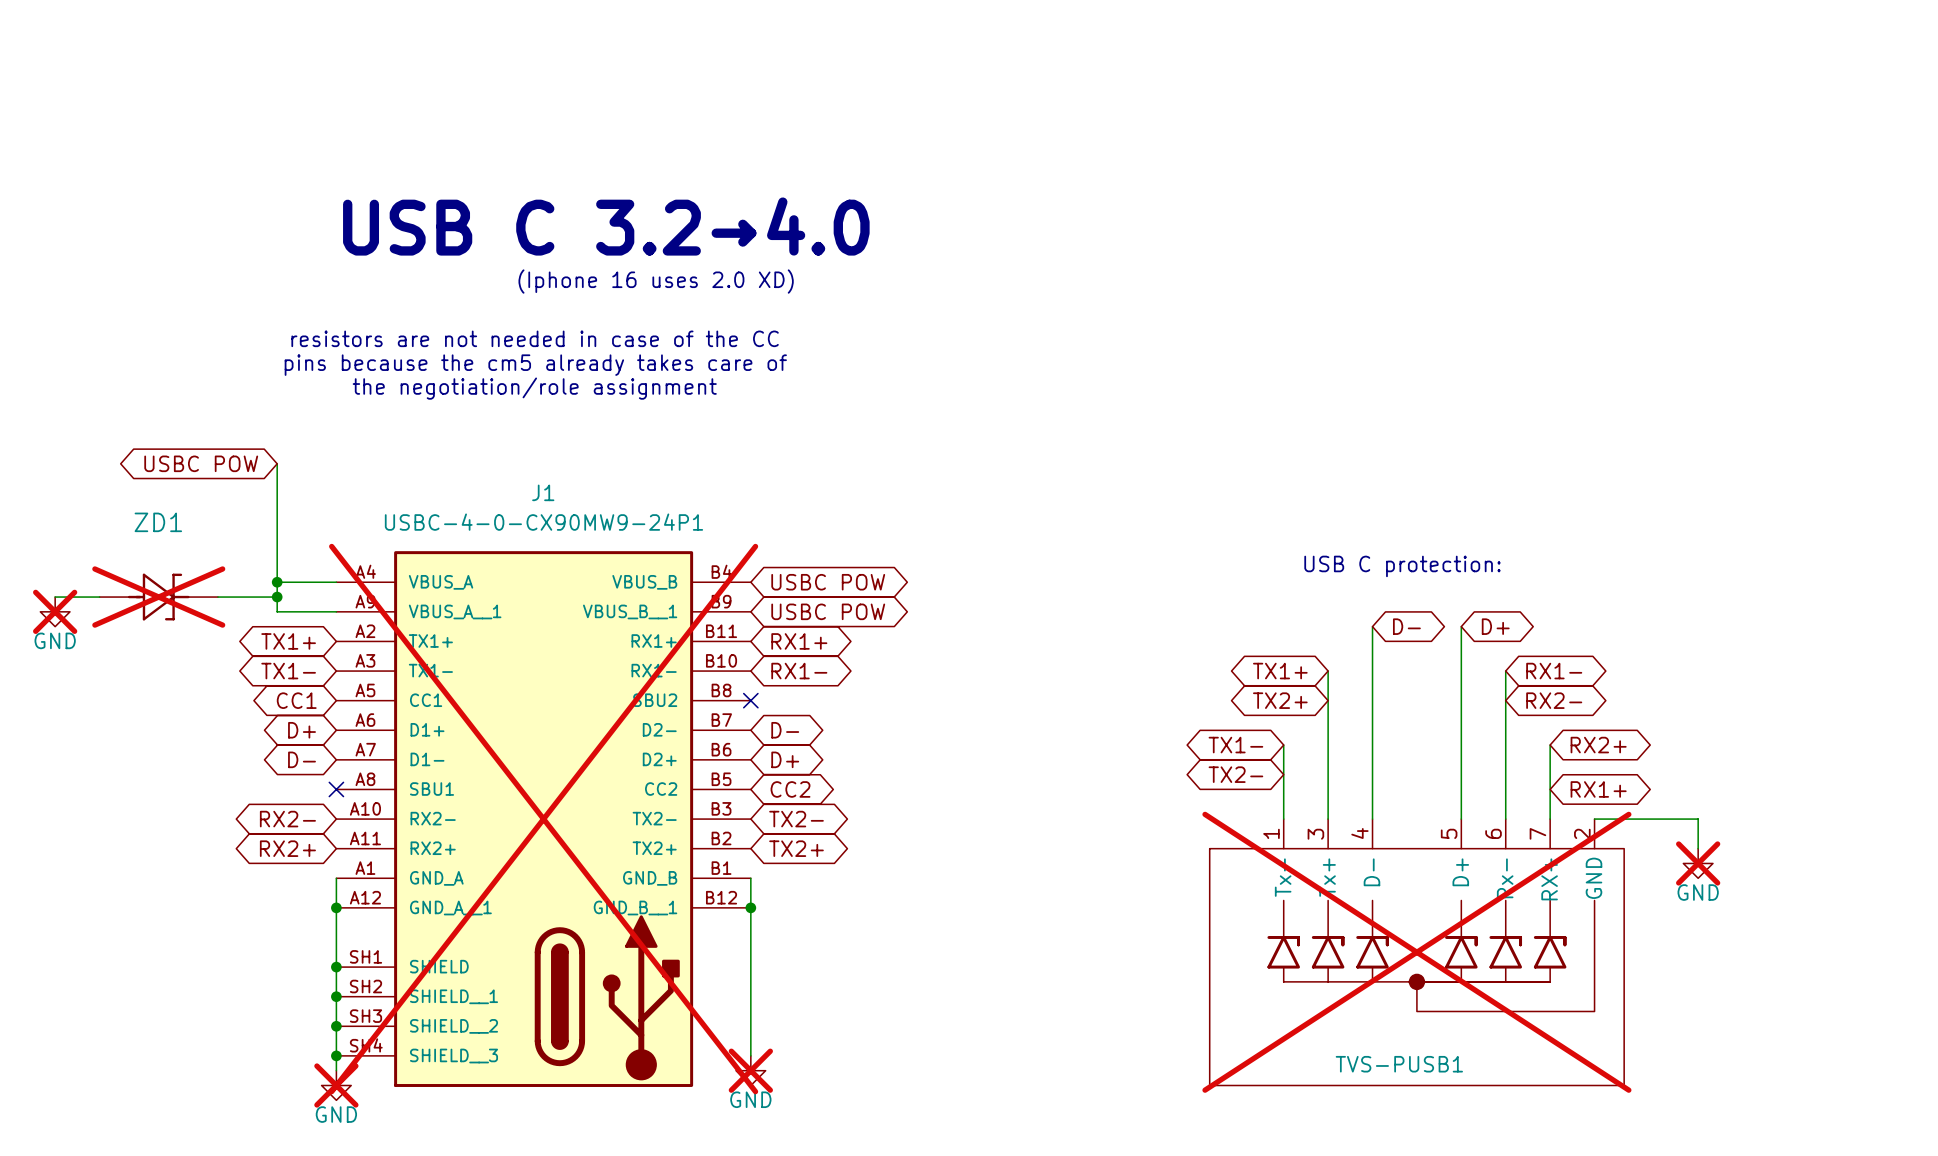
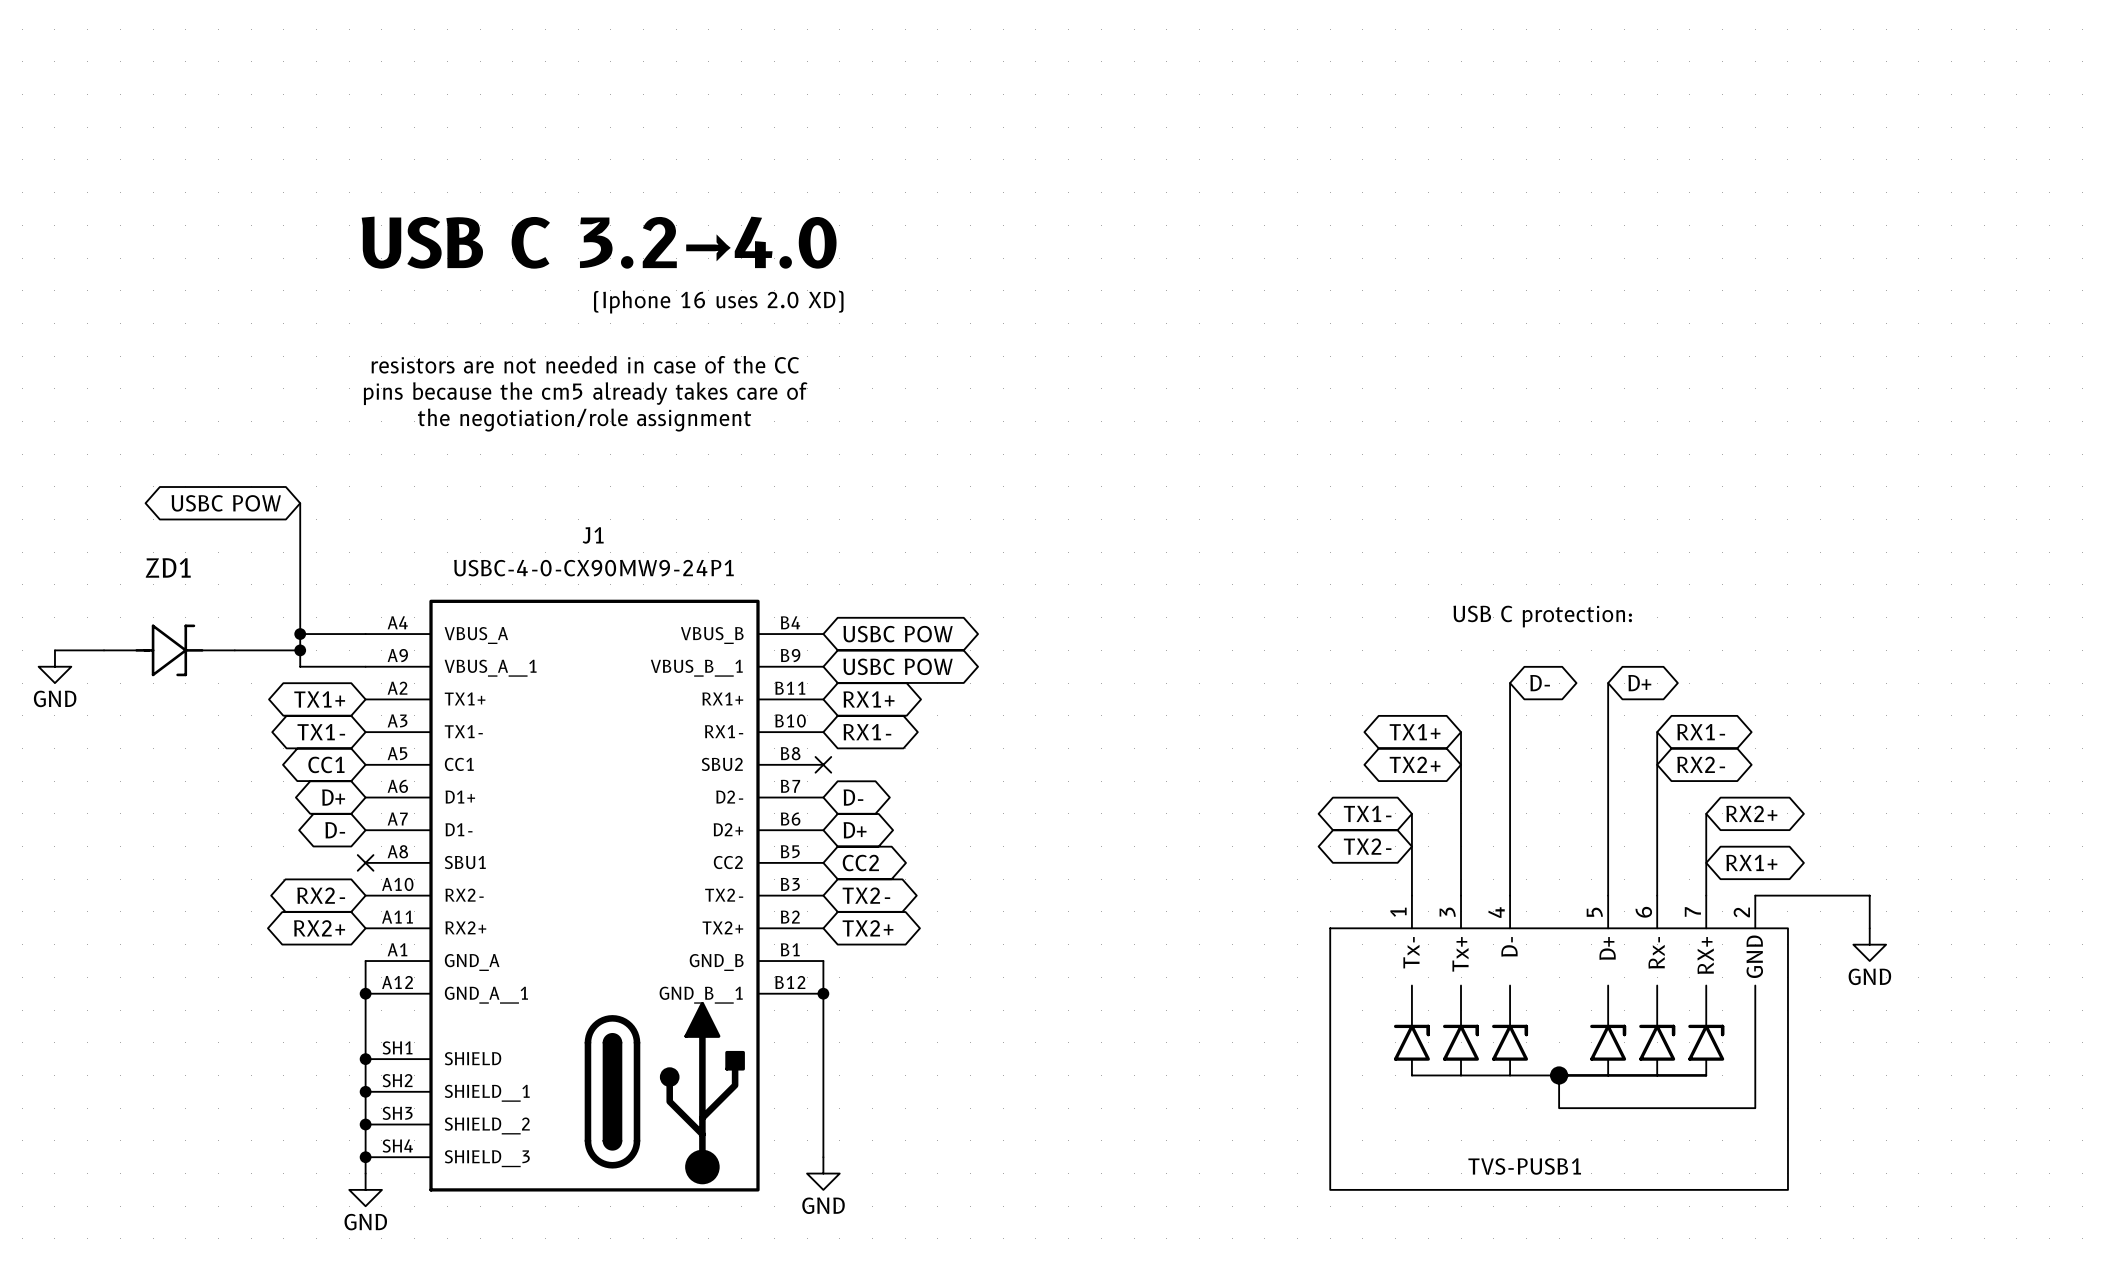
ZD1 do-not-place cross: (158, 597) -> none
power symbol do-not-place cross: (55, 611) -> none
J1 do-not-place cross: (543, 819) -> none
power symbol do-not-place cross: (1698, 863) -> none
TVS-PUSB1 do-not-place cross: (1416, 952) -> none
power symbol do-not-place cross: (750, 1070) -> none
power symbol do-not-place cross: (336, 1085) -> none

